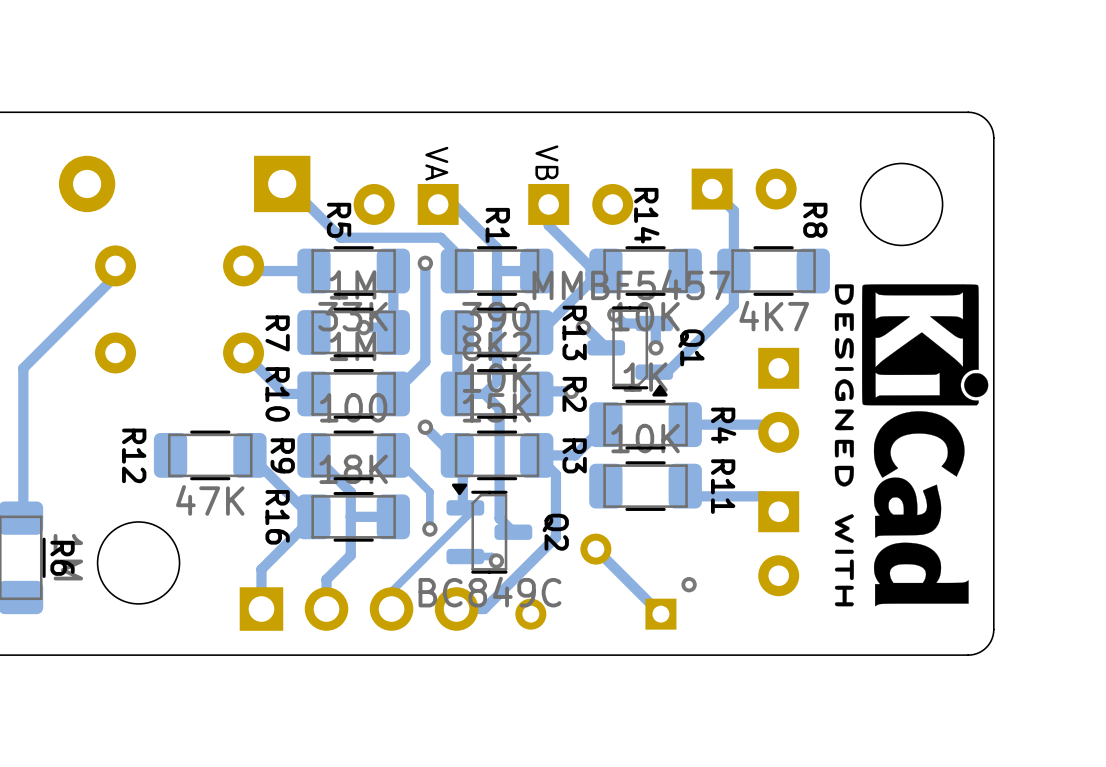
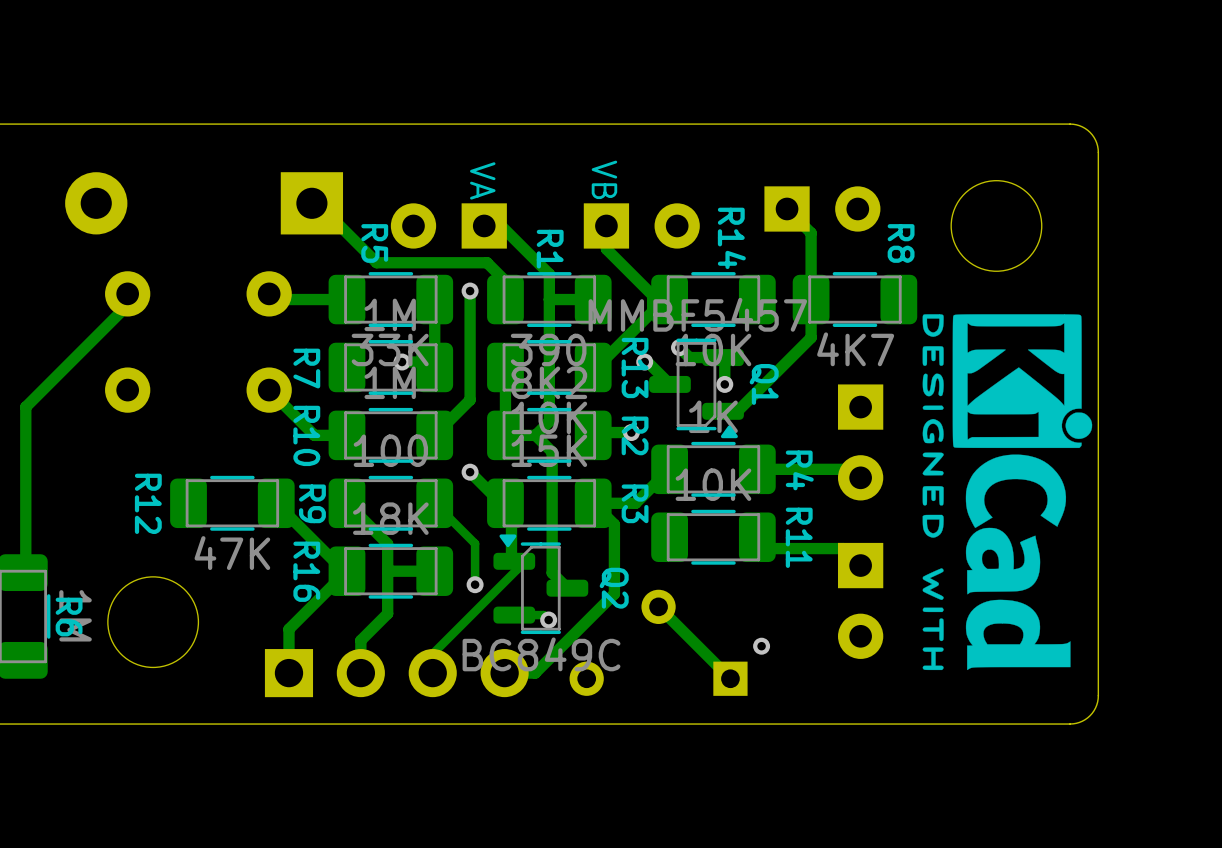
R14 name position: R14 (646, 215) -> R14 (731, 238)

